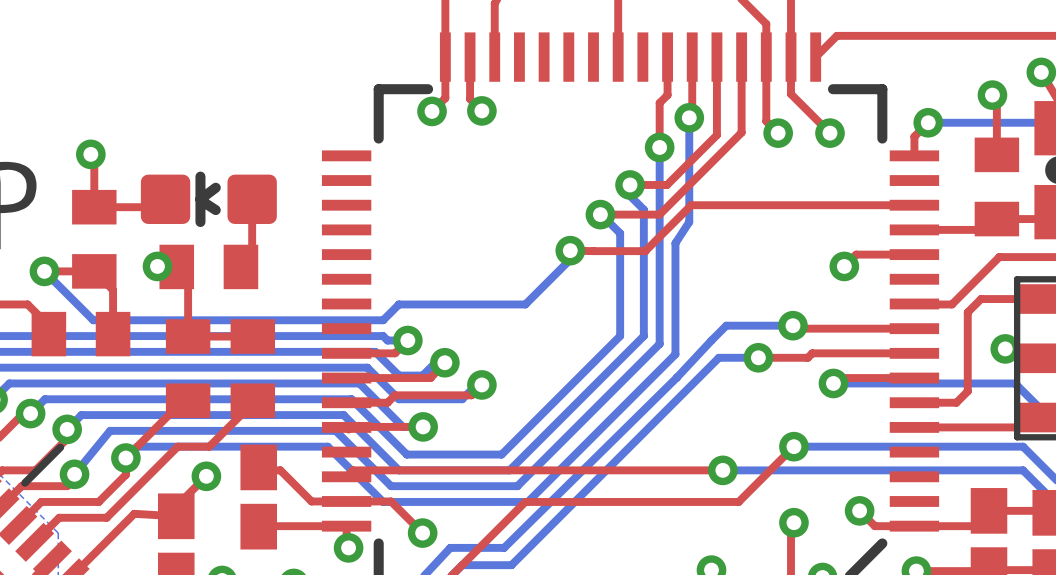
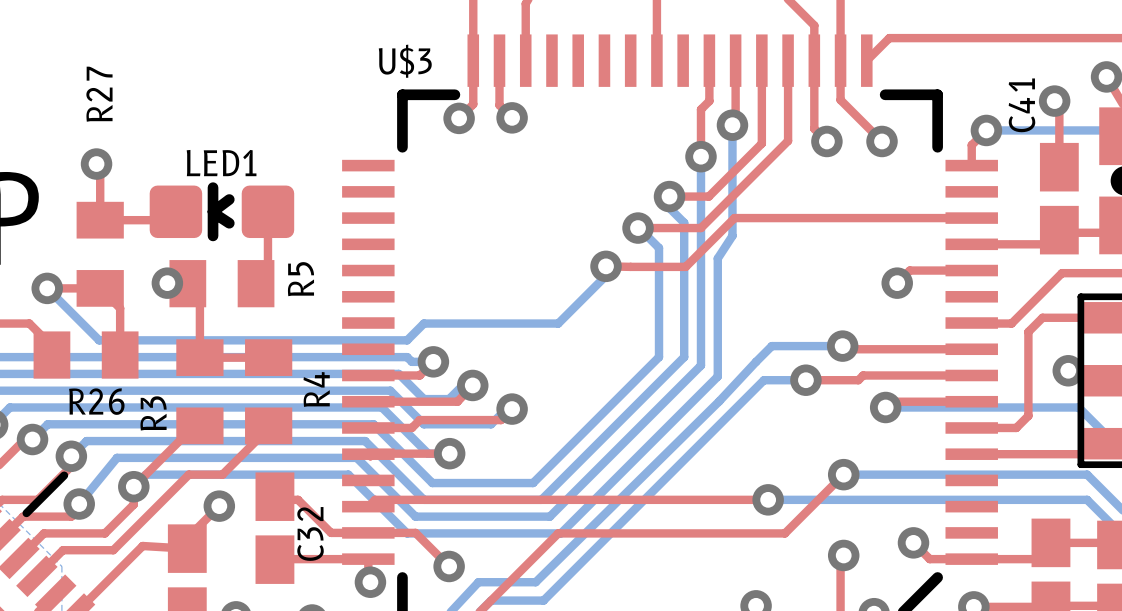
U$3 name: none -> U$3 (405, 61)
R27 name: none -> R27 (99, 94)
LED1 name: none -> LED1 (221, 163)
part: (996, 186) -> none
C41: none -> (1059, 198)
R5 name: none -> R5 (300, 279)
R4 name: none -> R4 (316, 389)
R26 name: none -> R26 (96, 401)
R3 name: none -> R3 (153, 413)
C32 name: none -> C32 (310, 533)

